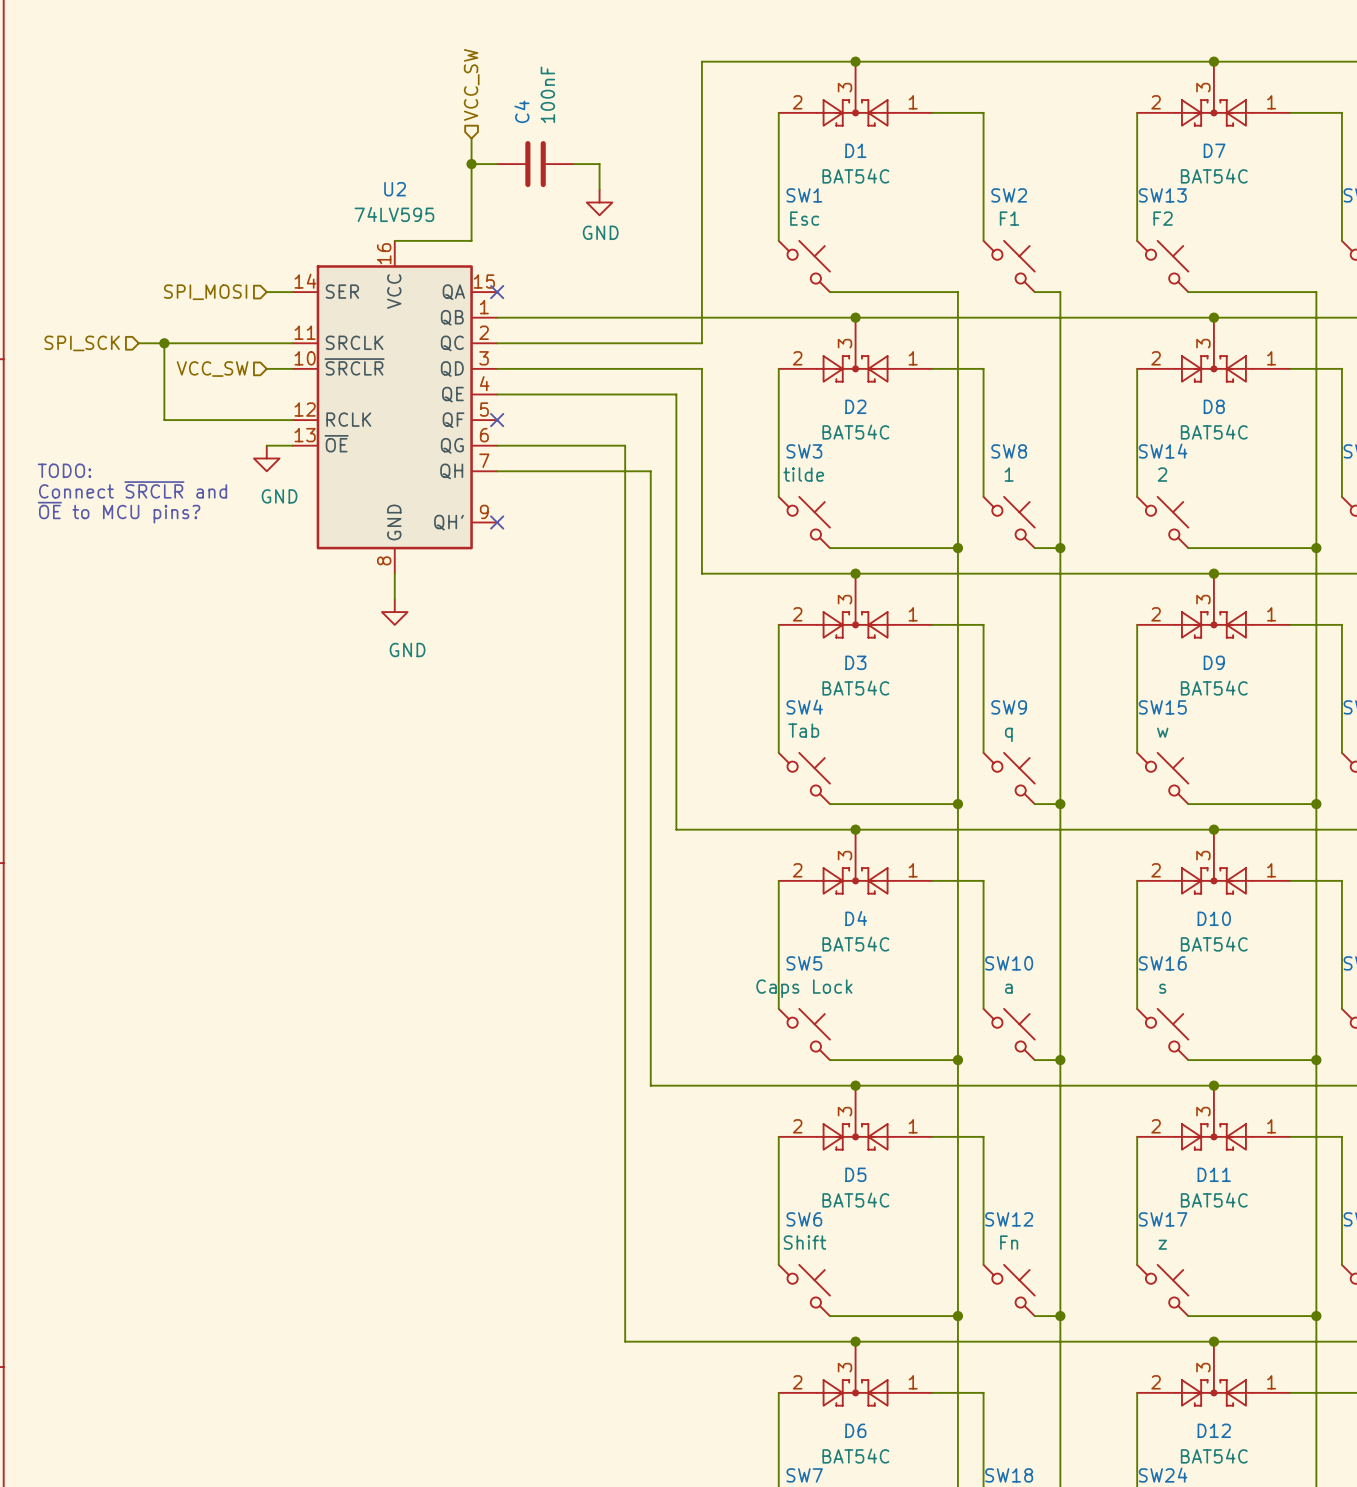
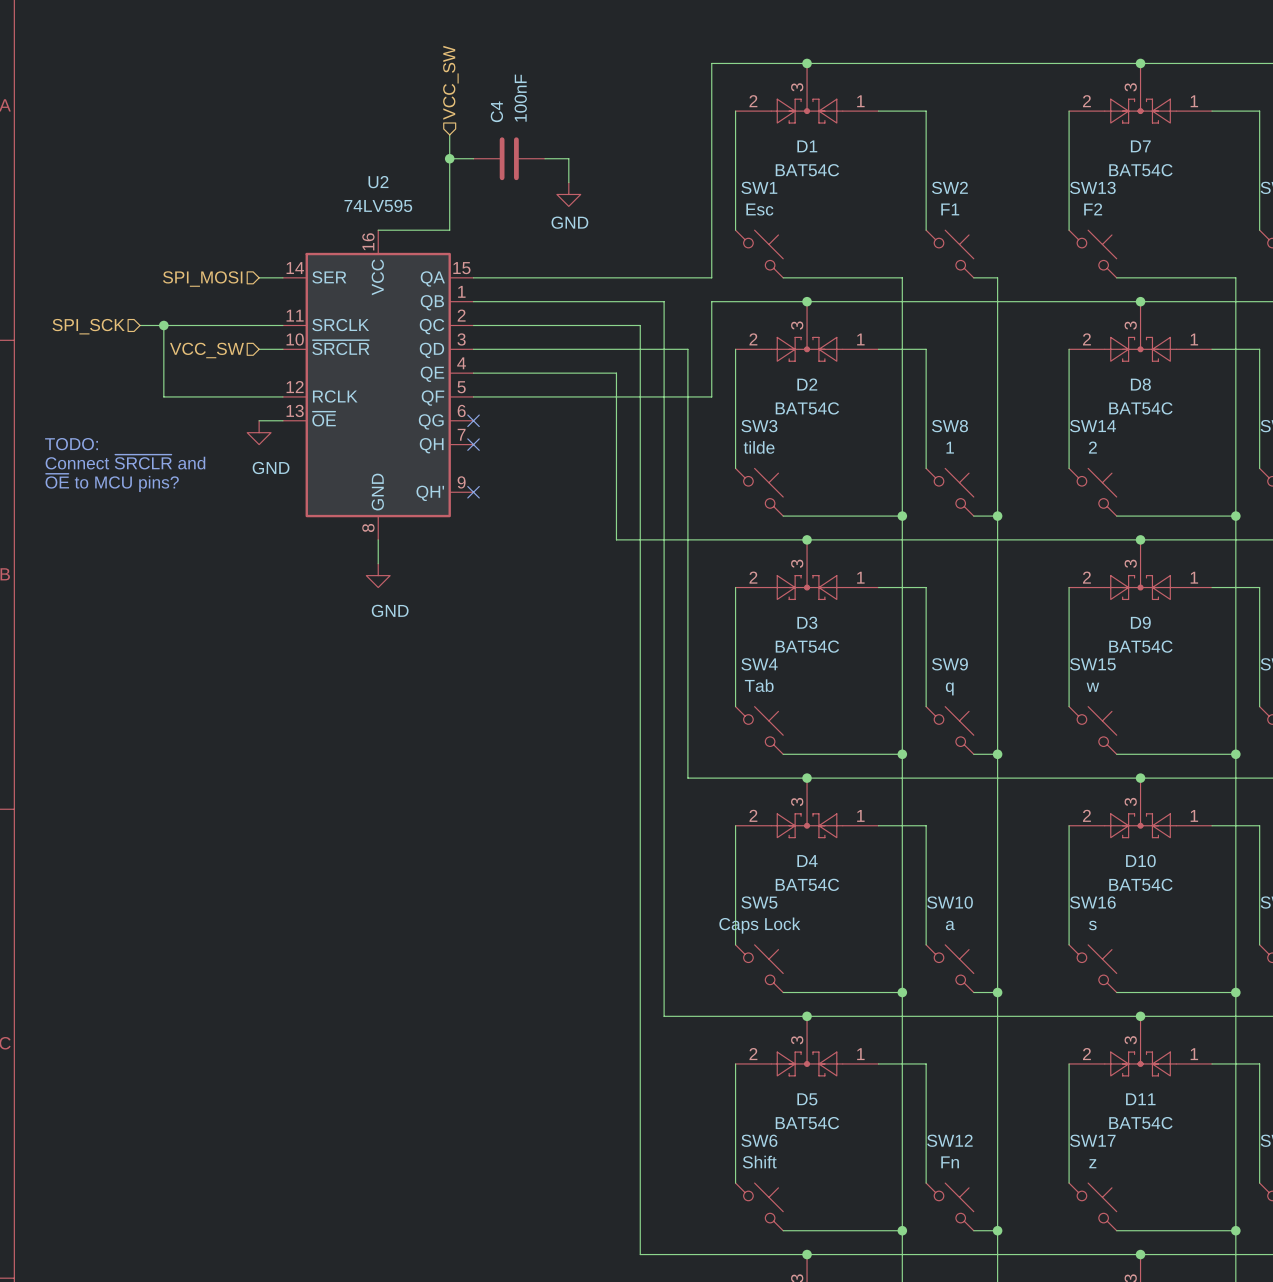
wire: (753, 61) (701, 61) (701, 317) (753, 317) -> (711, 63) (711, 277) (473, 277)
no-connect mark: (497, 292) -> none
wire: none -> (711, 301) (711, 396) (473, 396)
wire: (676, 343) (701, 343) -> none
wire: (650, 394) (676, 394) -> (640, 325) (640, 373)
no-connect mark: (497, 420) -> none
wire: (497, 445) (625, 445) (625, 1341) (676, 1341) -> (640, 778) (640, 1254)
no-connect mark: none -> (473, 420)
wire: (497, 471) (650, 471) -> (616, 373) (616, 444)
no-connect mark: none -> (473, 444)
wire: (650, 573) (650, 1085) (701, 1085) -> (616, 539) (664, 539) (664, 1016)
wire: (676, 829) (727, 829) -> (664, 325) (664, 349) (687, 349) (687, 778)

